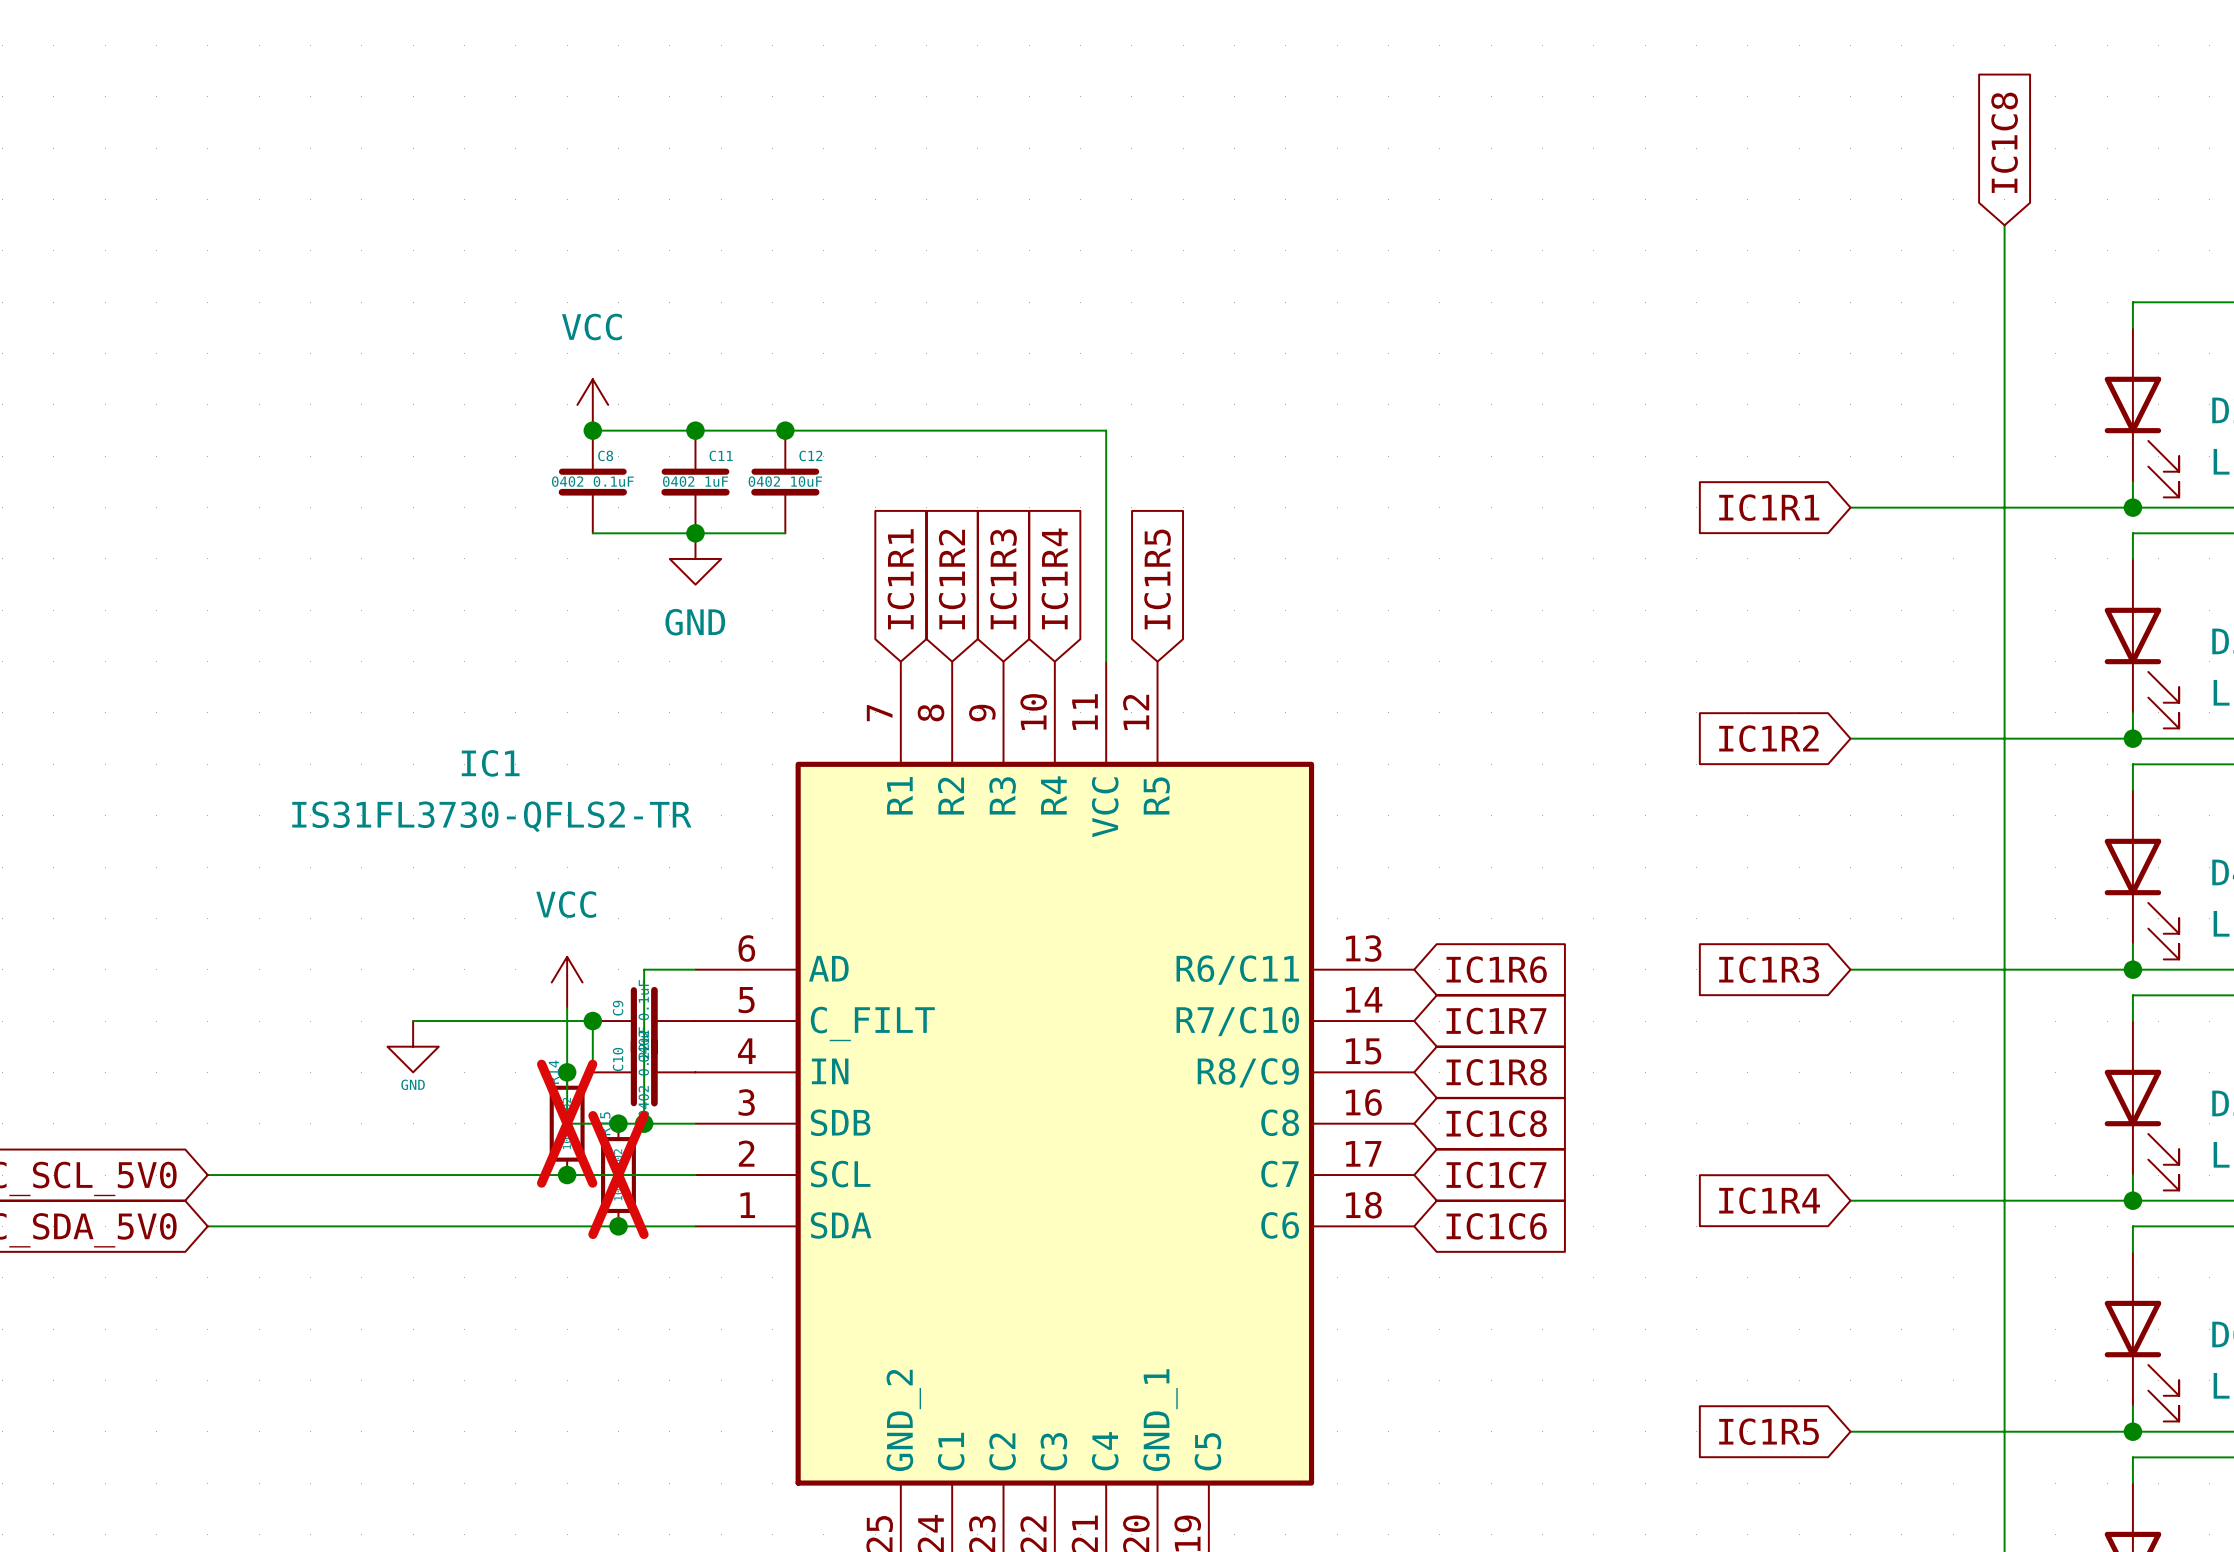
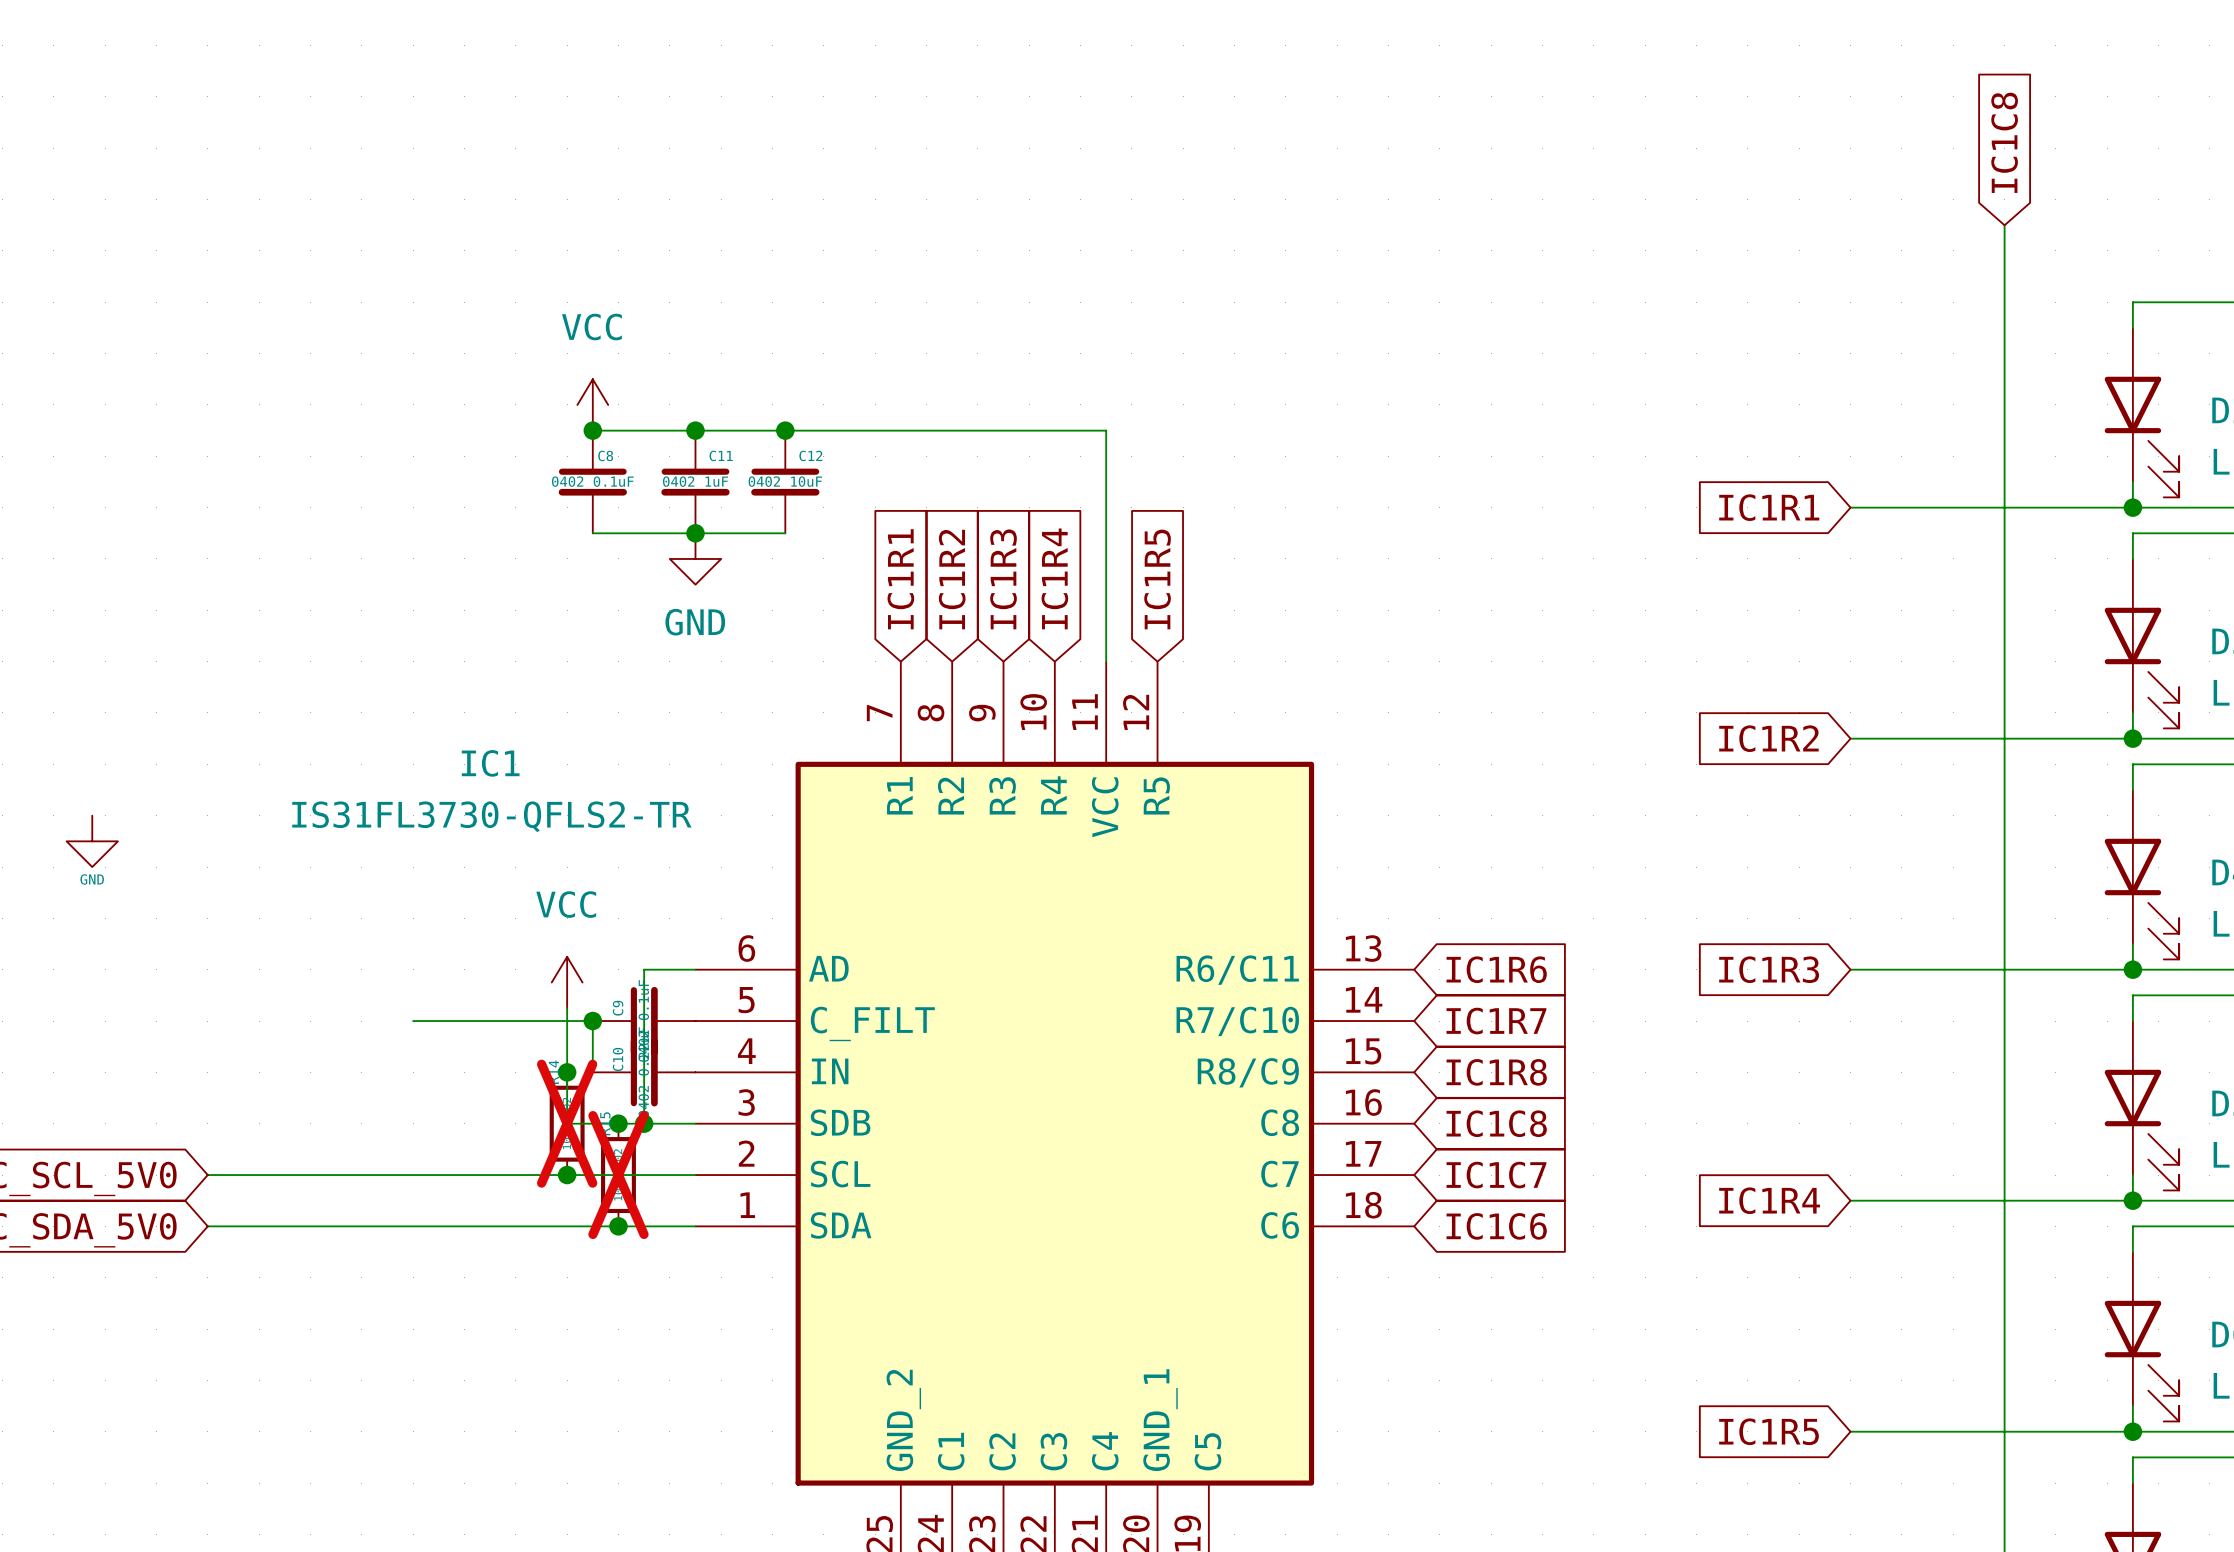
power symbol position: GND (413, 1046) -> GND (92, 841)

